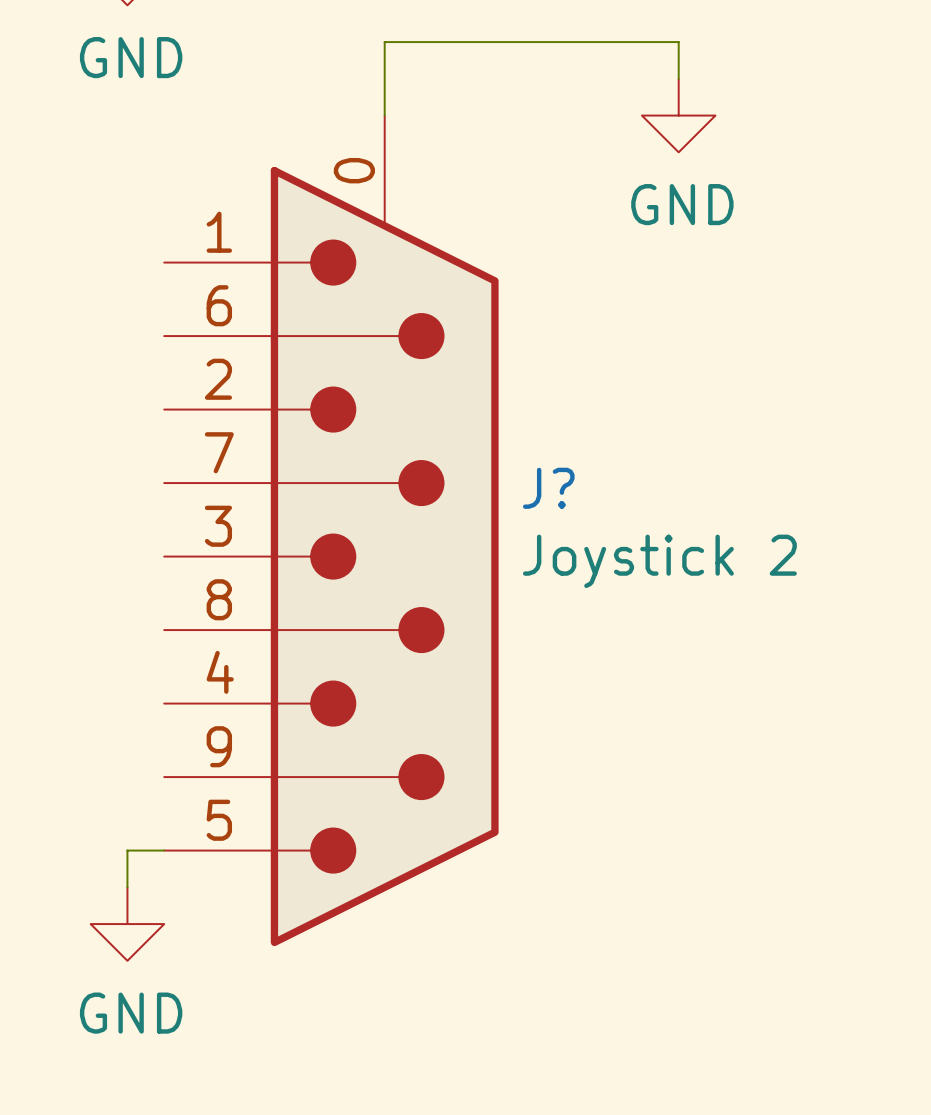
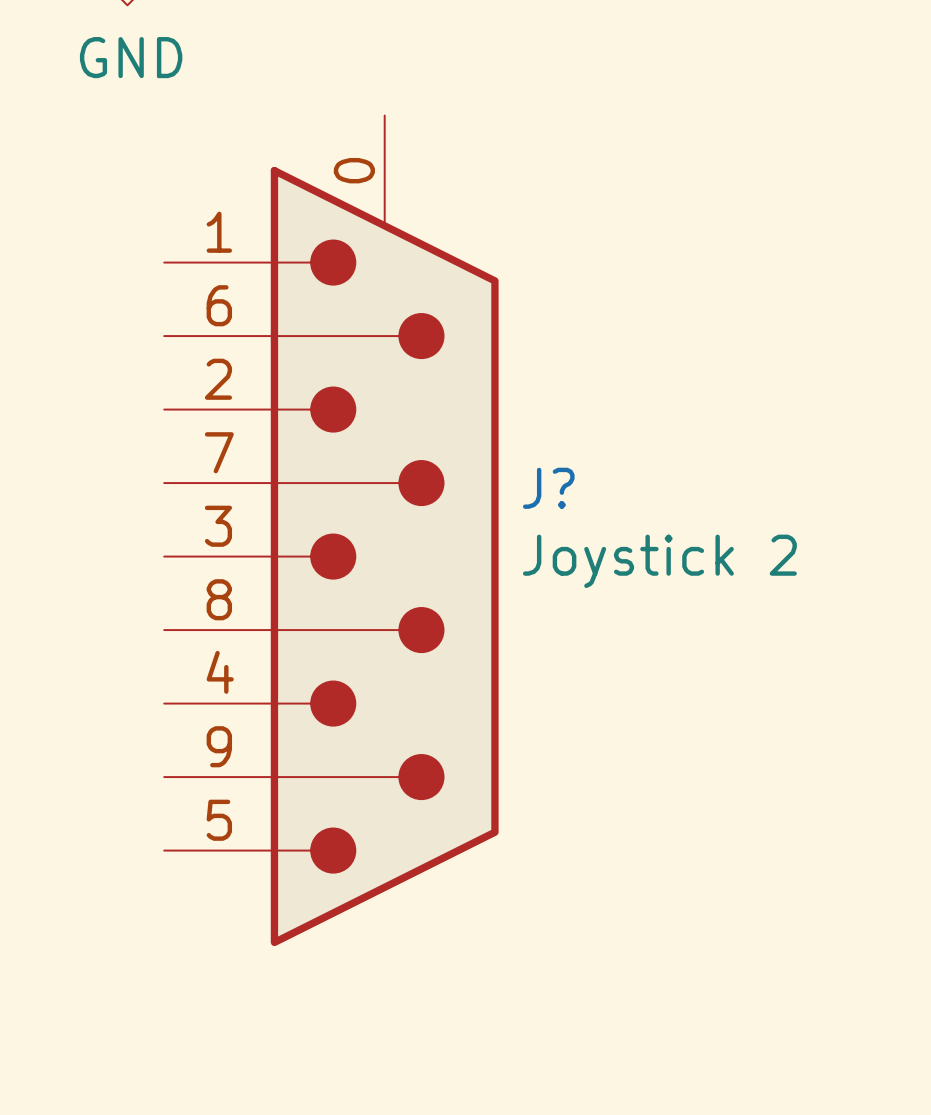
wire: (678, 78) (678, 42) (384, 42) (384, 115) -> none
power symbol: GND (678, 115) -> none
wire: (164, 850) (127, 850) (127, 887) -> none
power symbol: GND (127, 924) -> none

